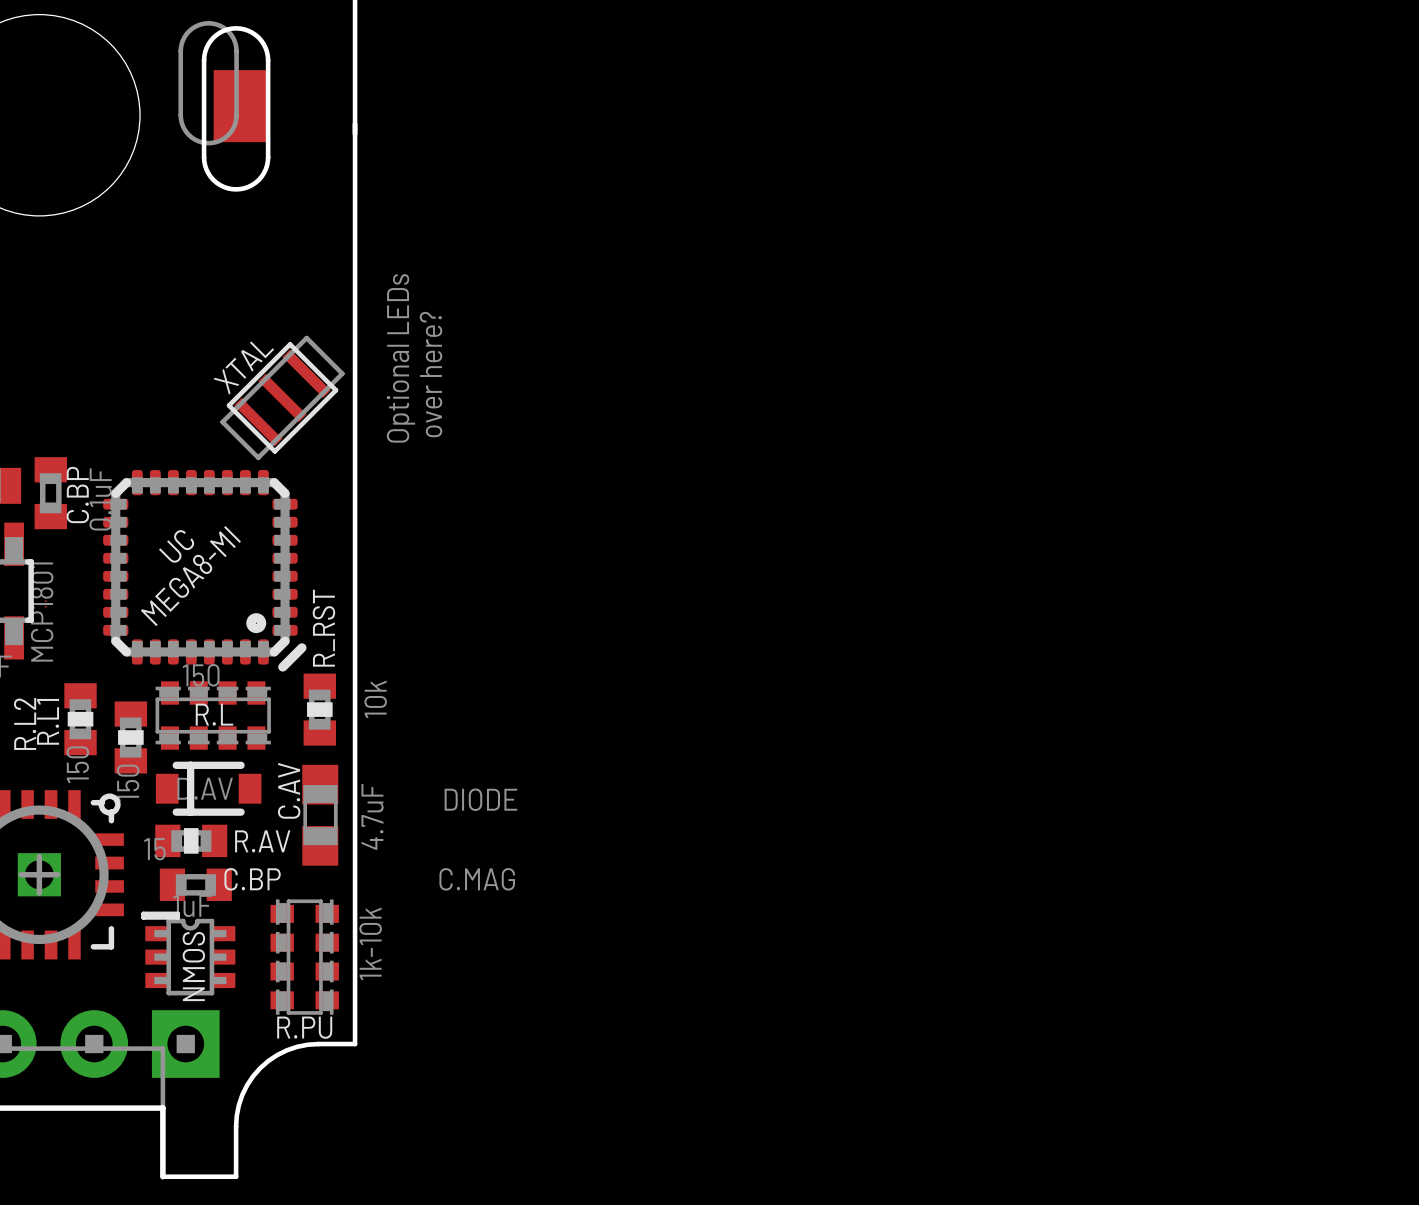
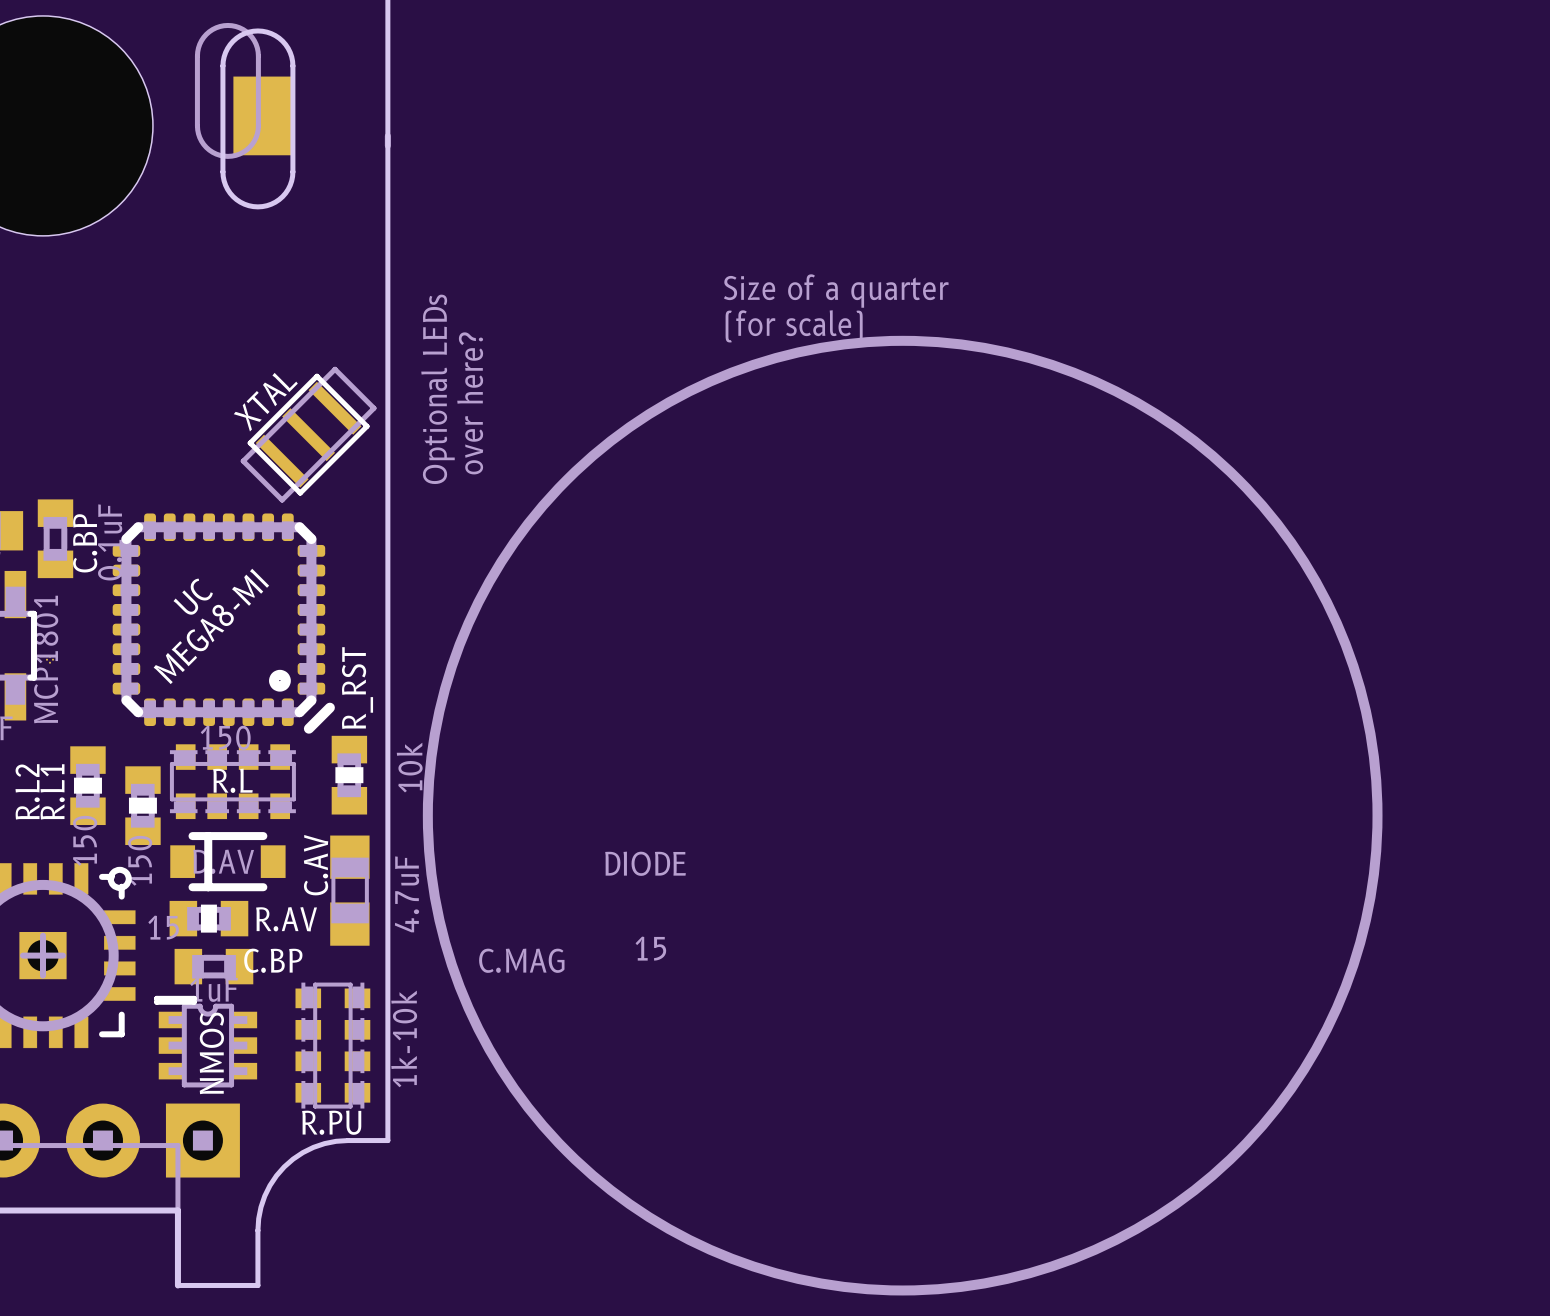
text: none -> Size of a quarter (836, 291)
text: none -> (for scale) (794, 326)
drawing: none -> [422, 335, 1383, 1296]
text position: DIODE (480, 799) -> DIODE (645, 863)
text: none -> 15 (650, 948)

